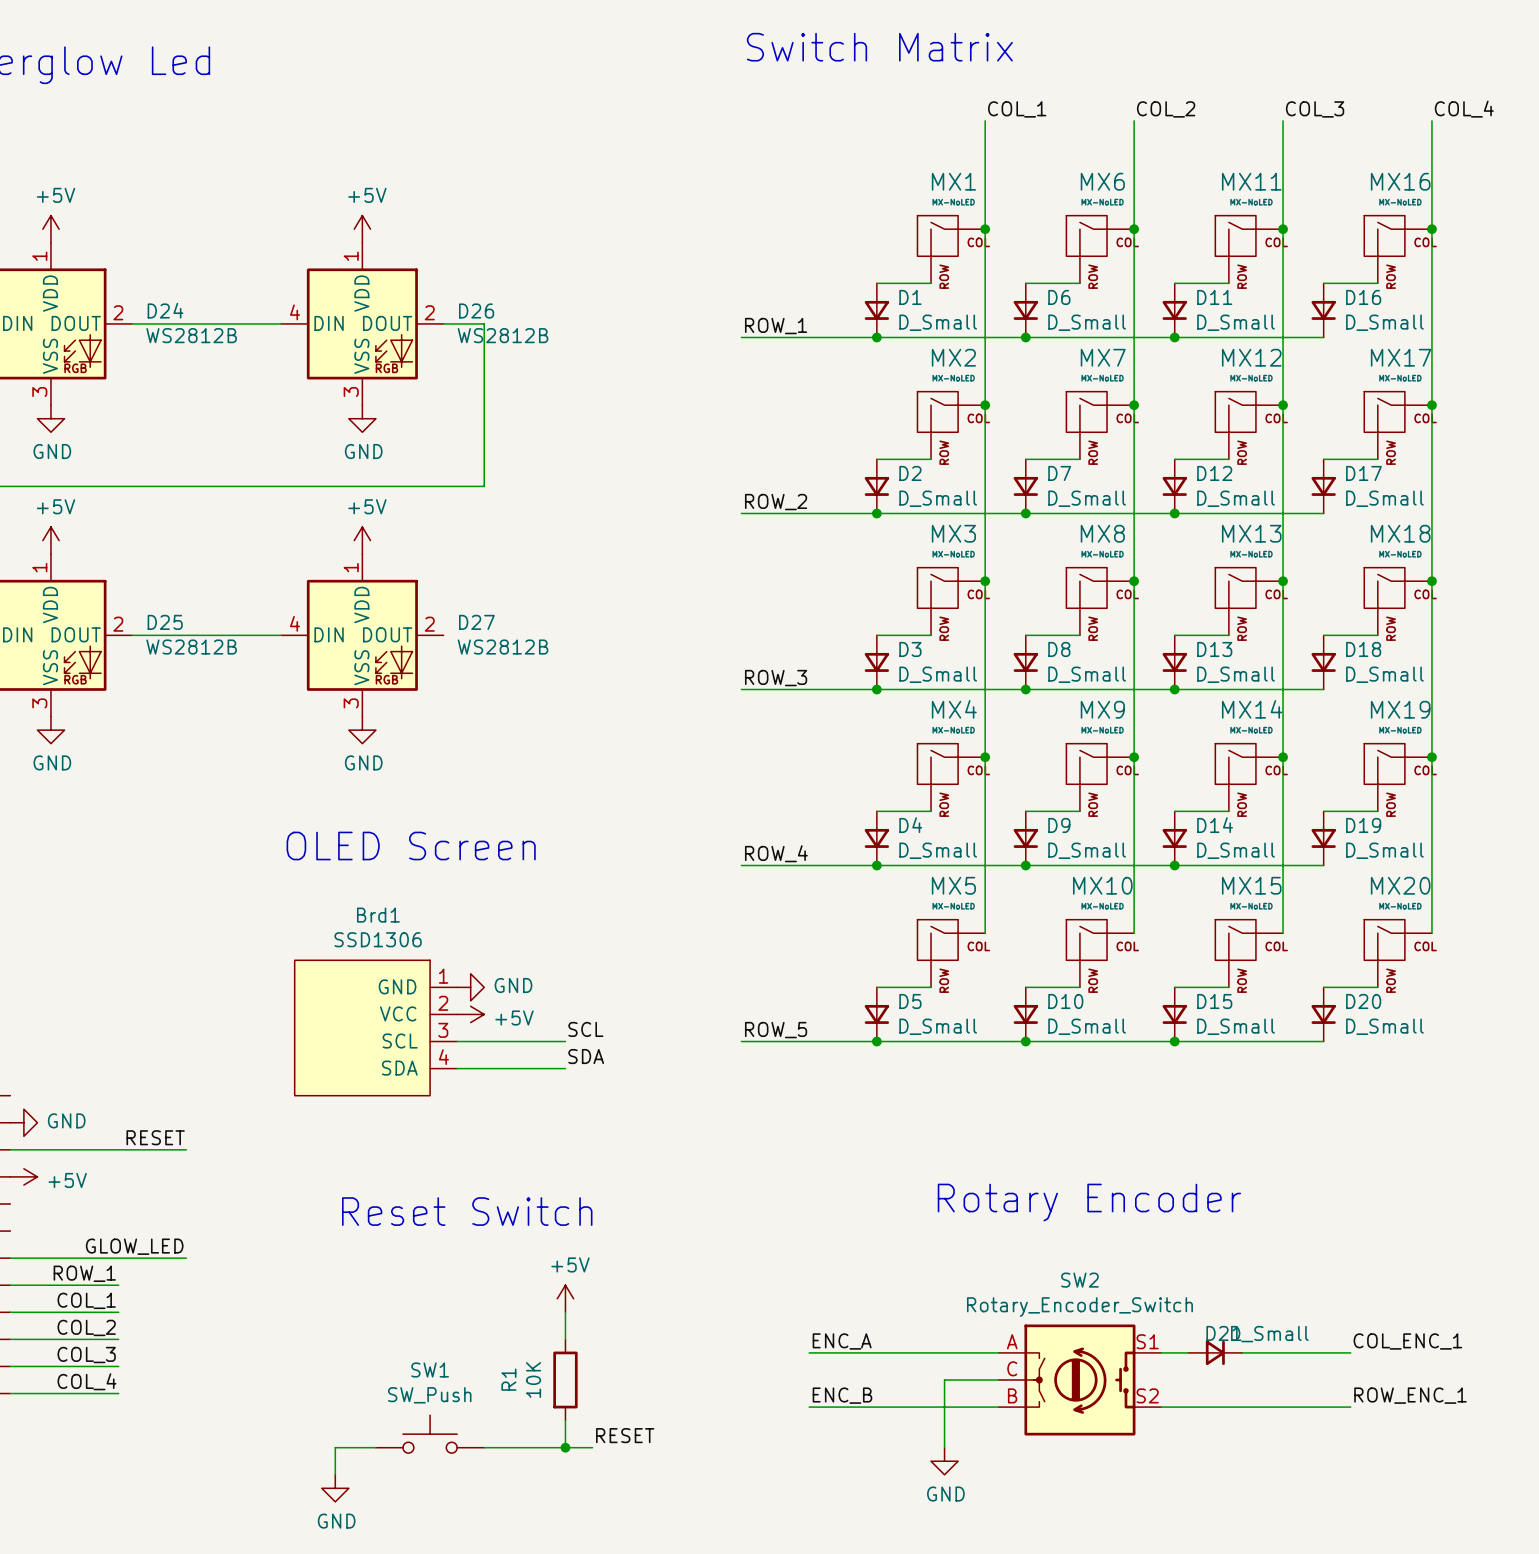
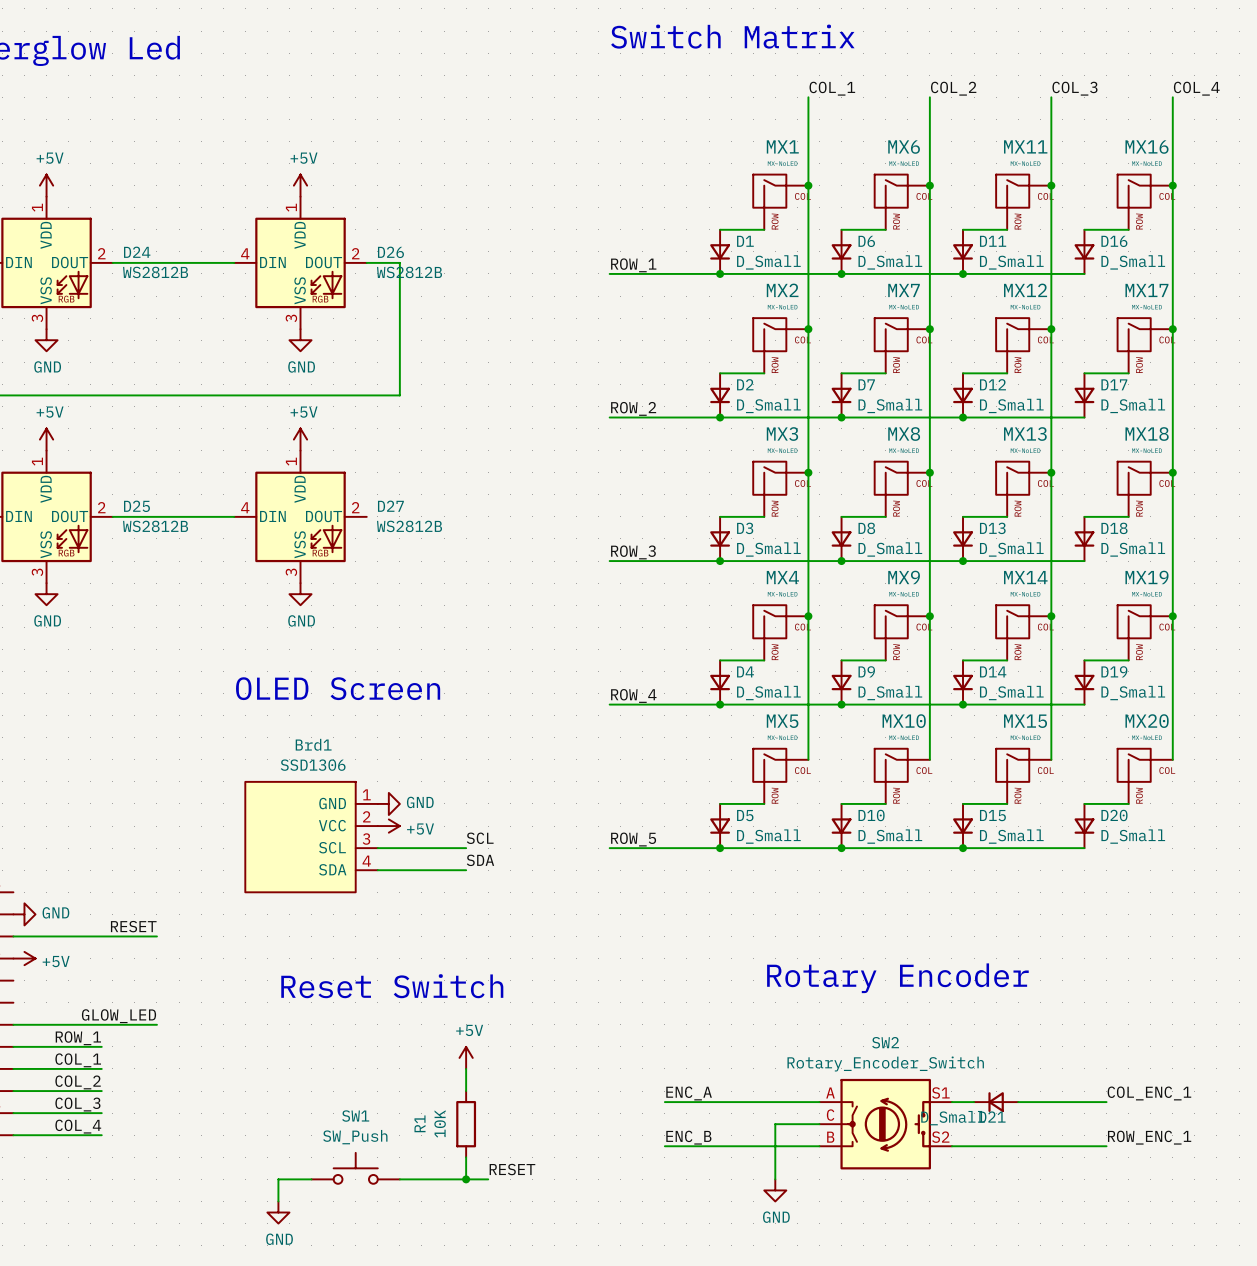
D21 rotation: 0° (1215, 1352) -> 180° (996, 1102)

